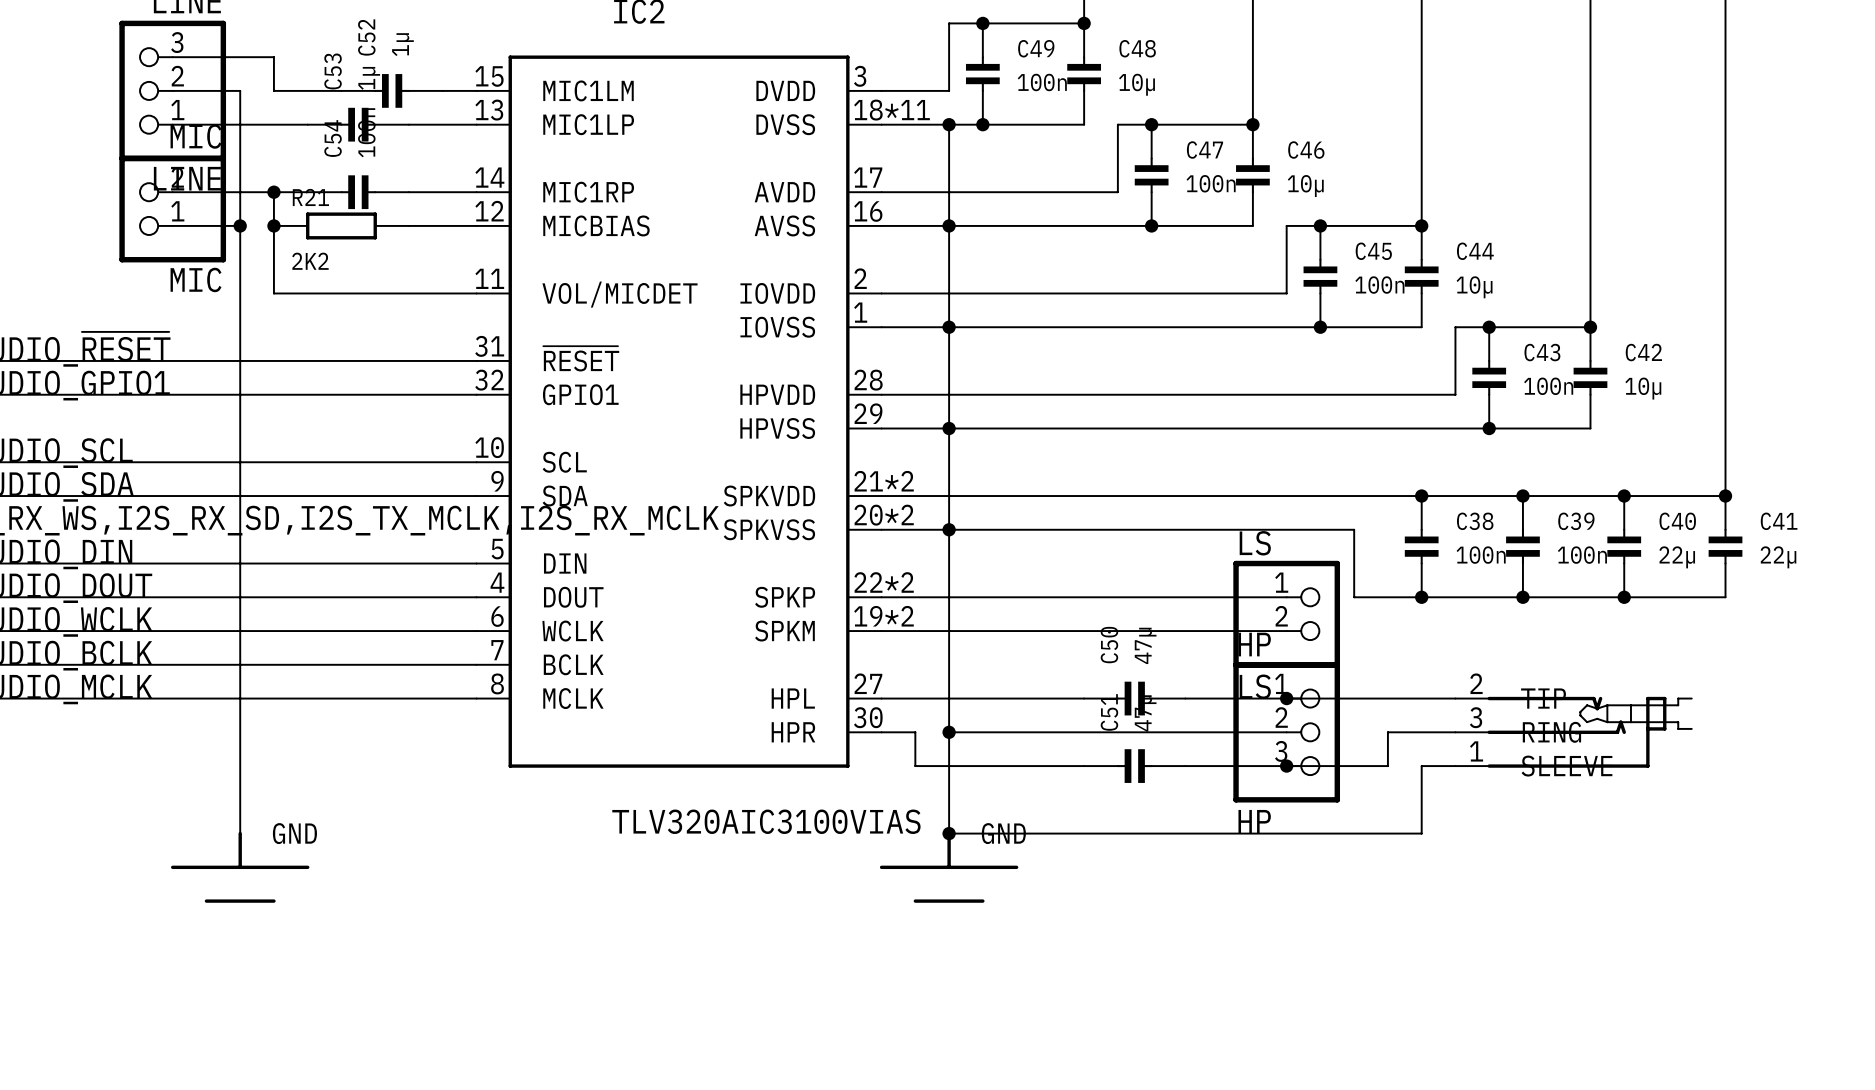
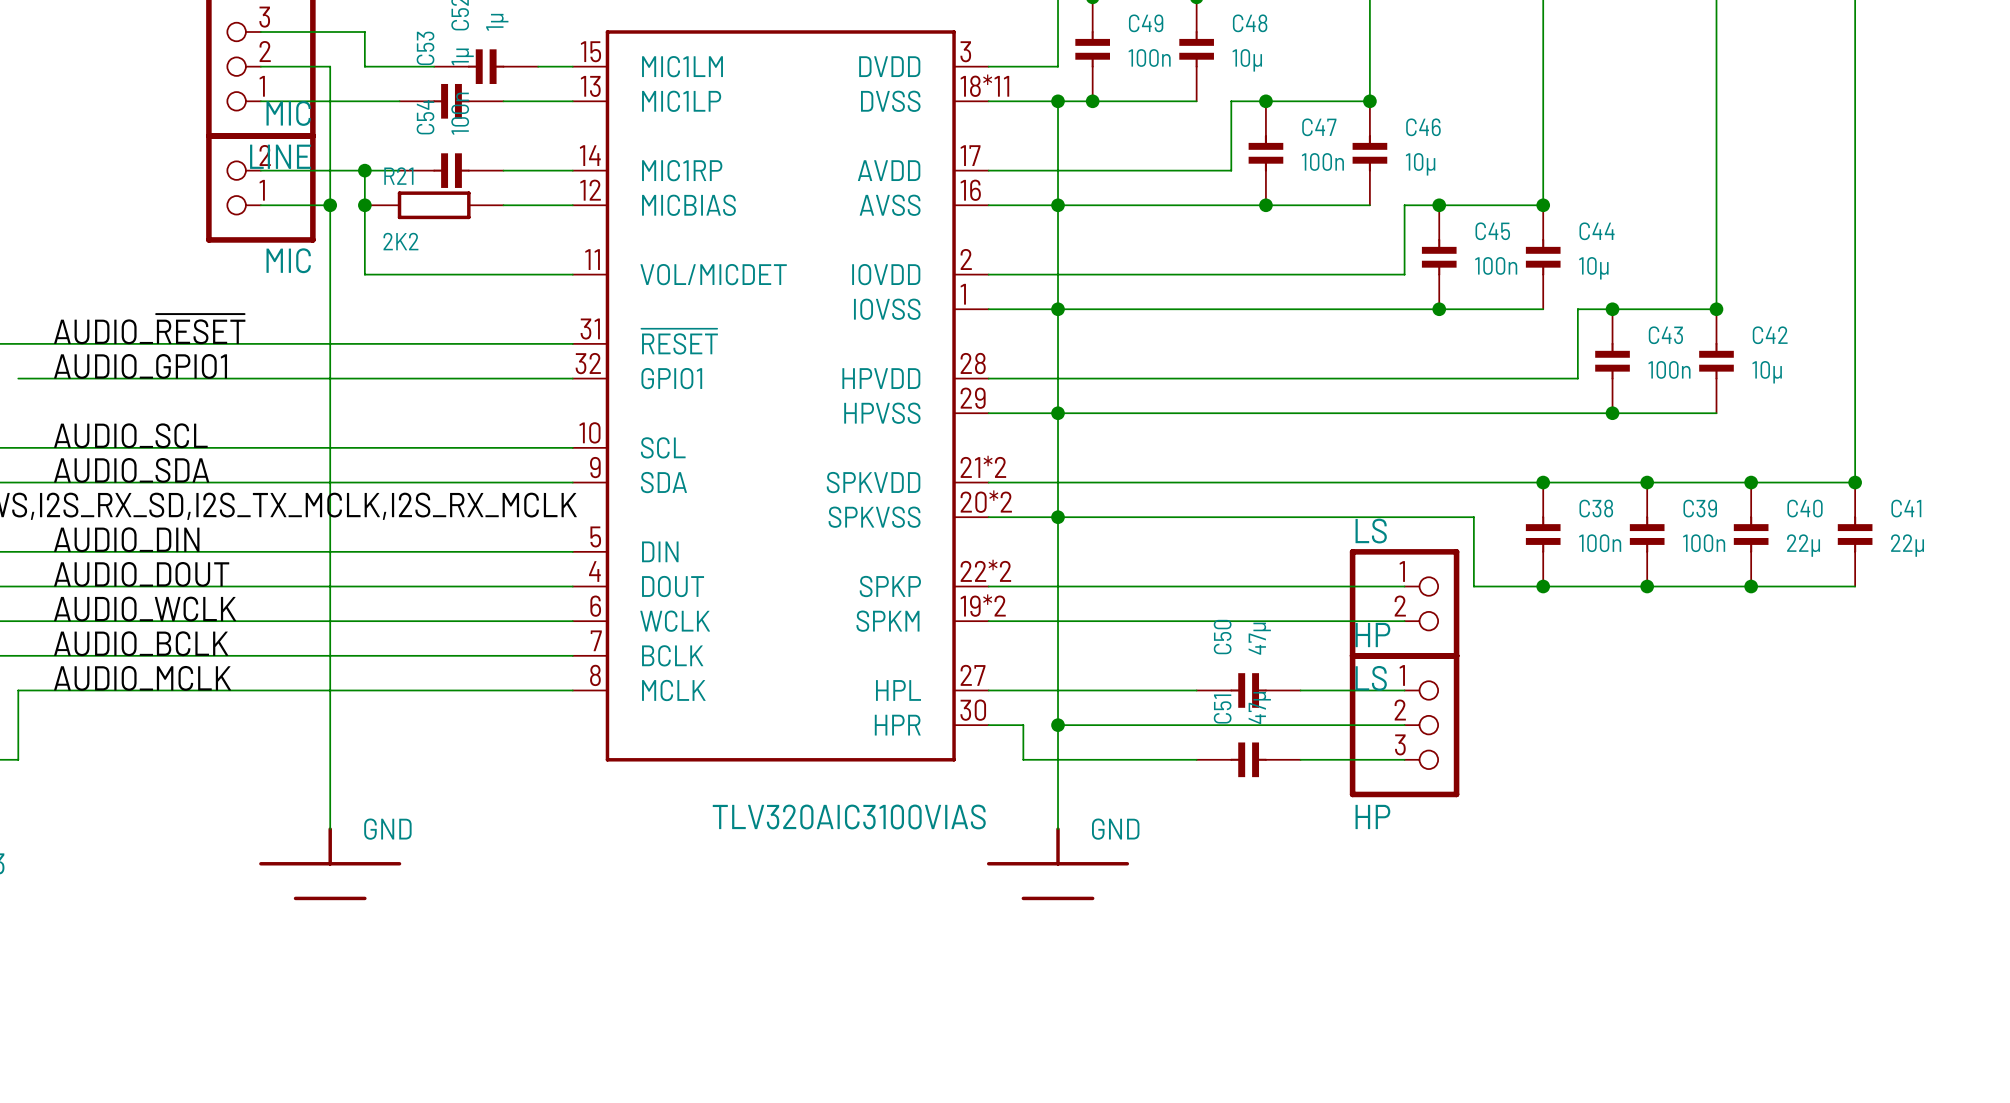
wire: (1286, 698) (1455, 698) -> none
junction: (1286, 698) -> none
wire: (1455, 732) (1387, 732) (1387, 766) (1286, 766) -> none
part: (1574, 732) -> none
junction: (1286, 766) -> none
wire: (1455, 766) (1421, 766) (1421, 833) (949, 833) -> none
junction: (949, 833) -> none

